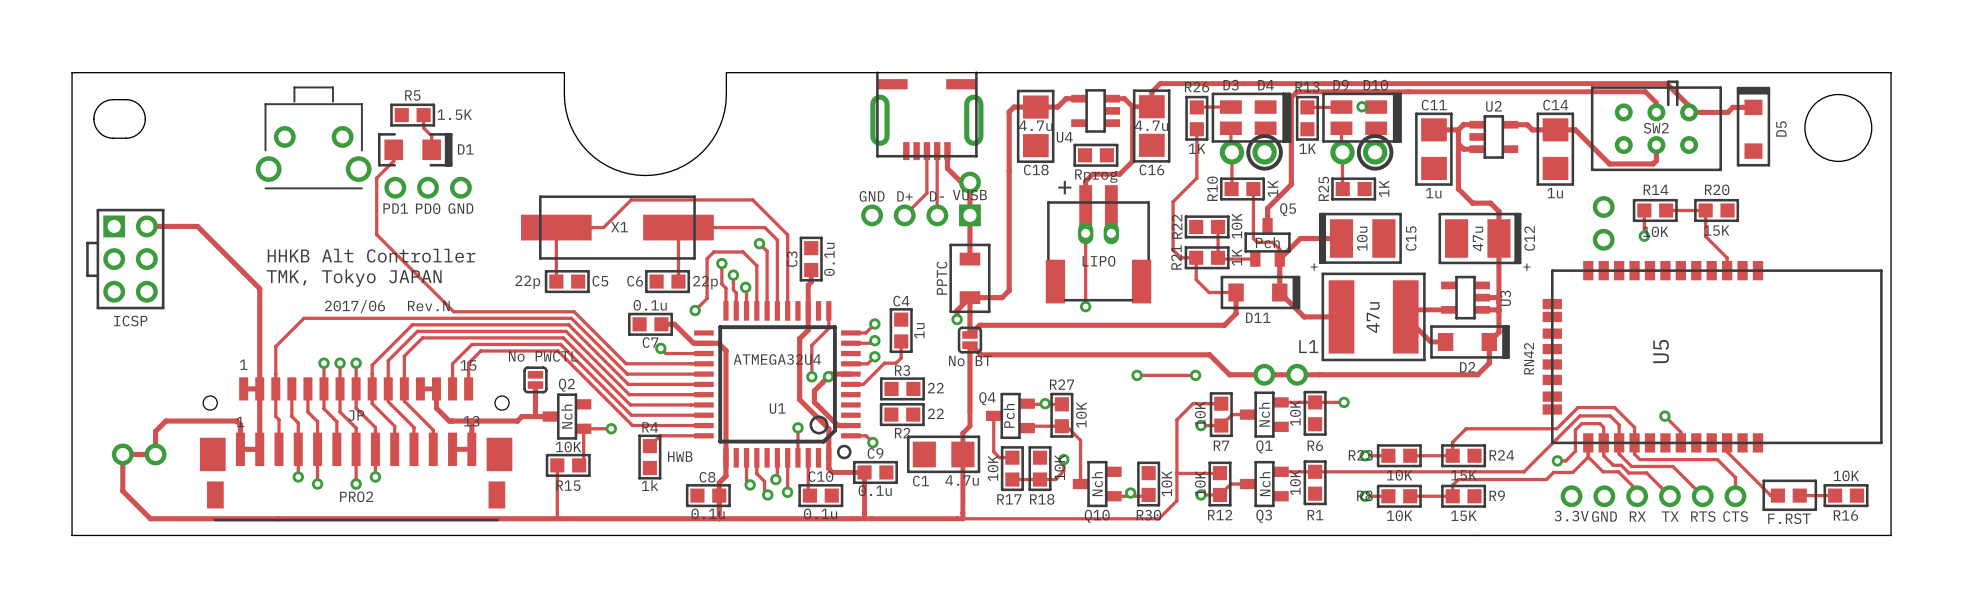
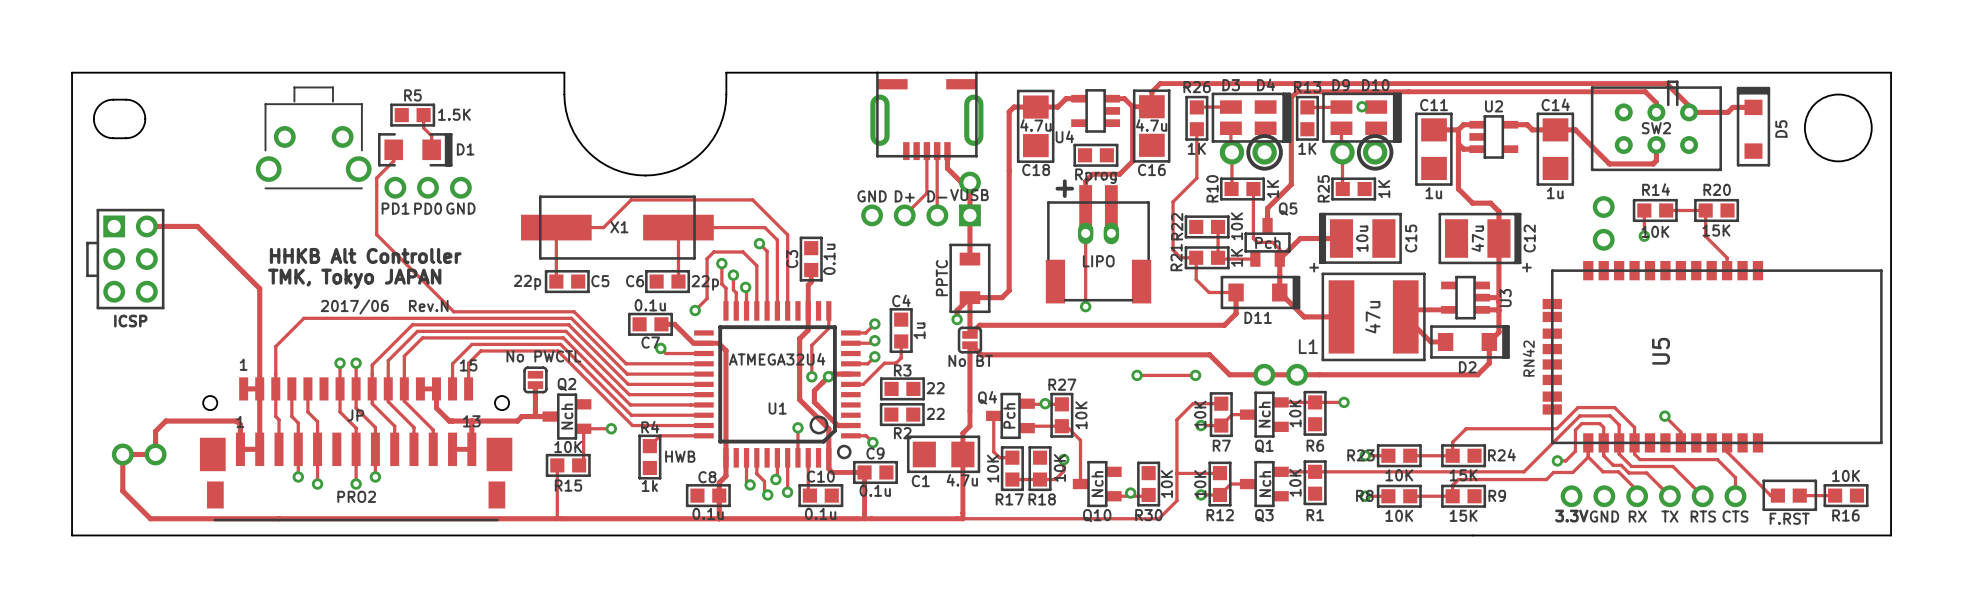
track: (323, 363) (323, 408) (336, 421) (336, 449) -> none
via: (323, 363) -> none

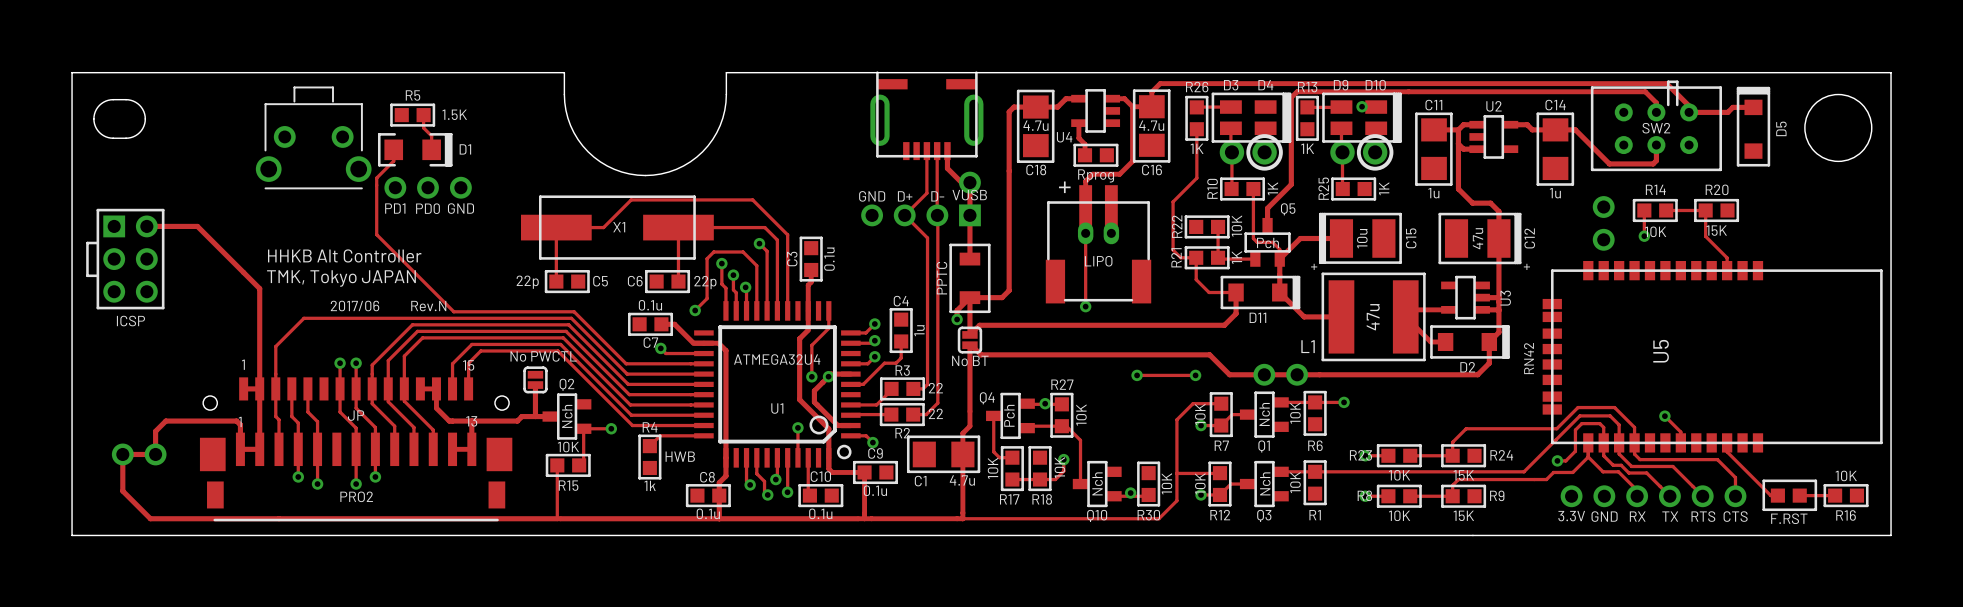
track: none -> (1078, 123) (1078, 138) (1085, 144) (1085, 154)
track: none -> (904, 215) (927, 238) (927, 384) (923, 388) (912, 388)
track: none -> (937, 215) (937, 403) (926, 414) (912, 414)
track: none -> (892, 388) (876, 404) (850, 404)
track: none -> (892, 414) (850, 415)

